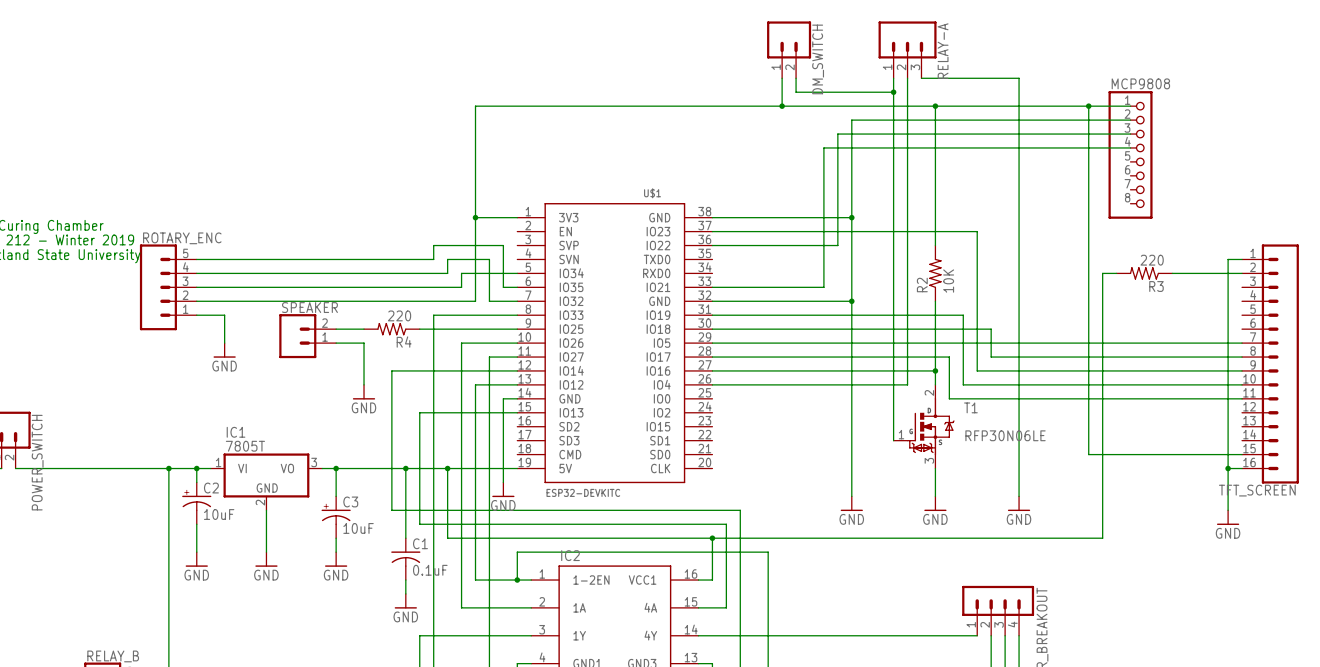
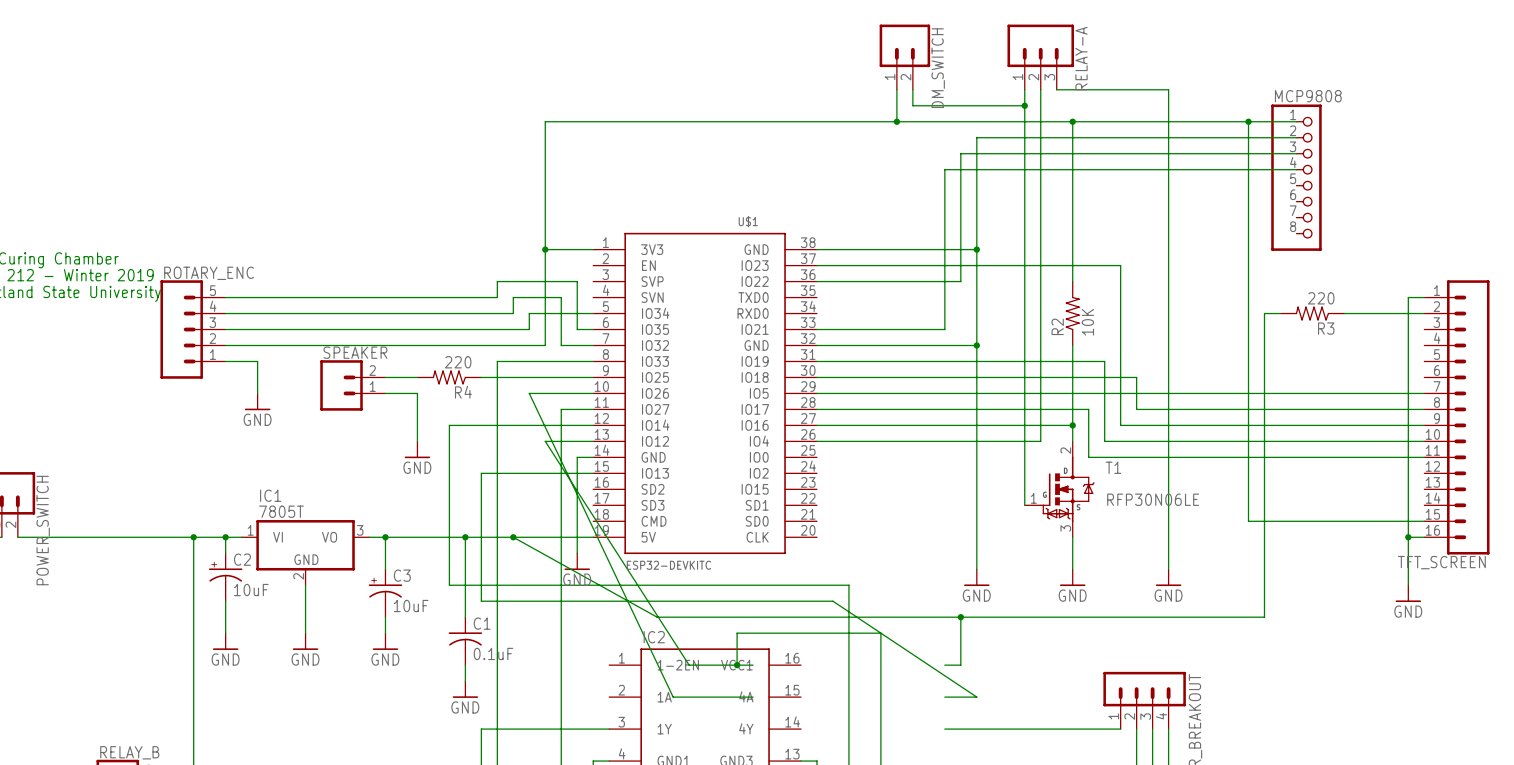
wire: (461, 343) (461, 607) (531, 607) -> (529, 393) (673, 697) (753, 697)
wire: (475, 384) (475, 580) (531, 580) -> (545, 441) (689, 665) (753, 665)
wire: (447, 468) (447, 538) (573, 538) -> (513, 537) (657, 617)
wire: (726, 524) (726, 607) (698, 607) -> (832, 601) (976, 697) (944, 697)
wire: (712, 538) (712, 580) (698, 580) -> (960, 617) (960, 665) (944, 665)
junction: (712, 538) -> none
junction: none -> (960, 617)
wire: (642, 552) (517, 552) (517, 580) -> (737, 633) (737, 665)
junction: (517, 580) -> none
junction: none -> (737, 665)
wire: (698, 635) (823, 635) -> none

